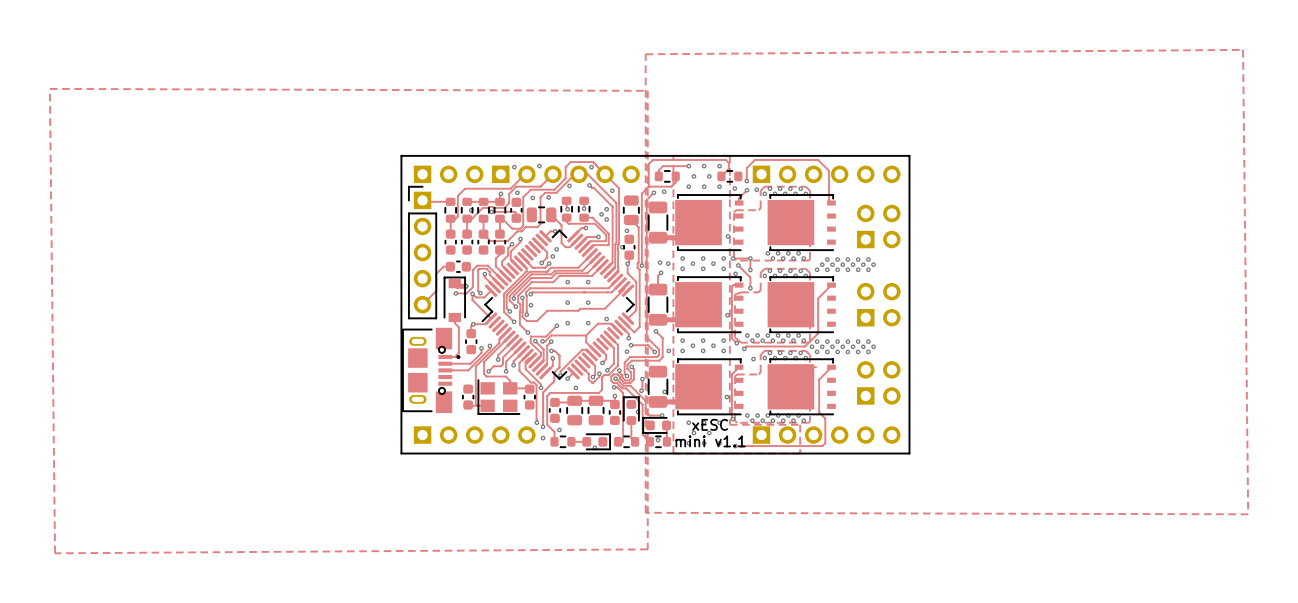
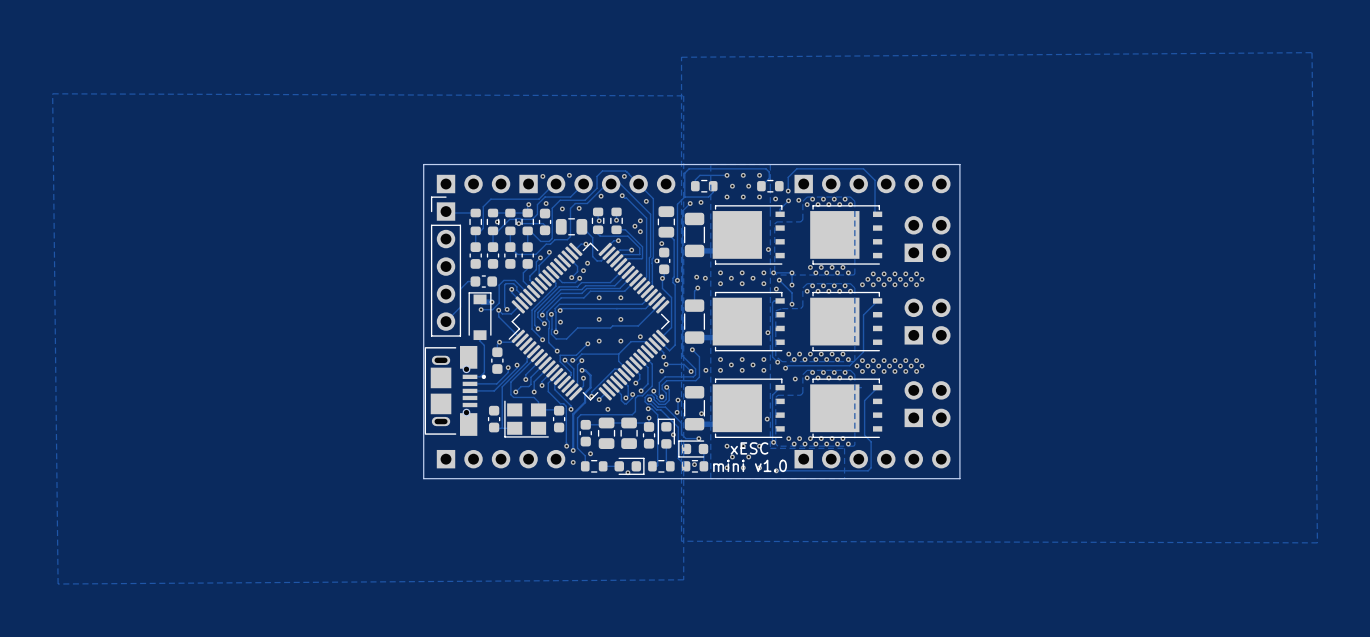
text: mini v1.1 (710, 441) -> mini v1.0 (750, 465)

